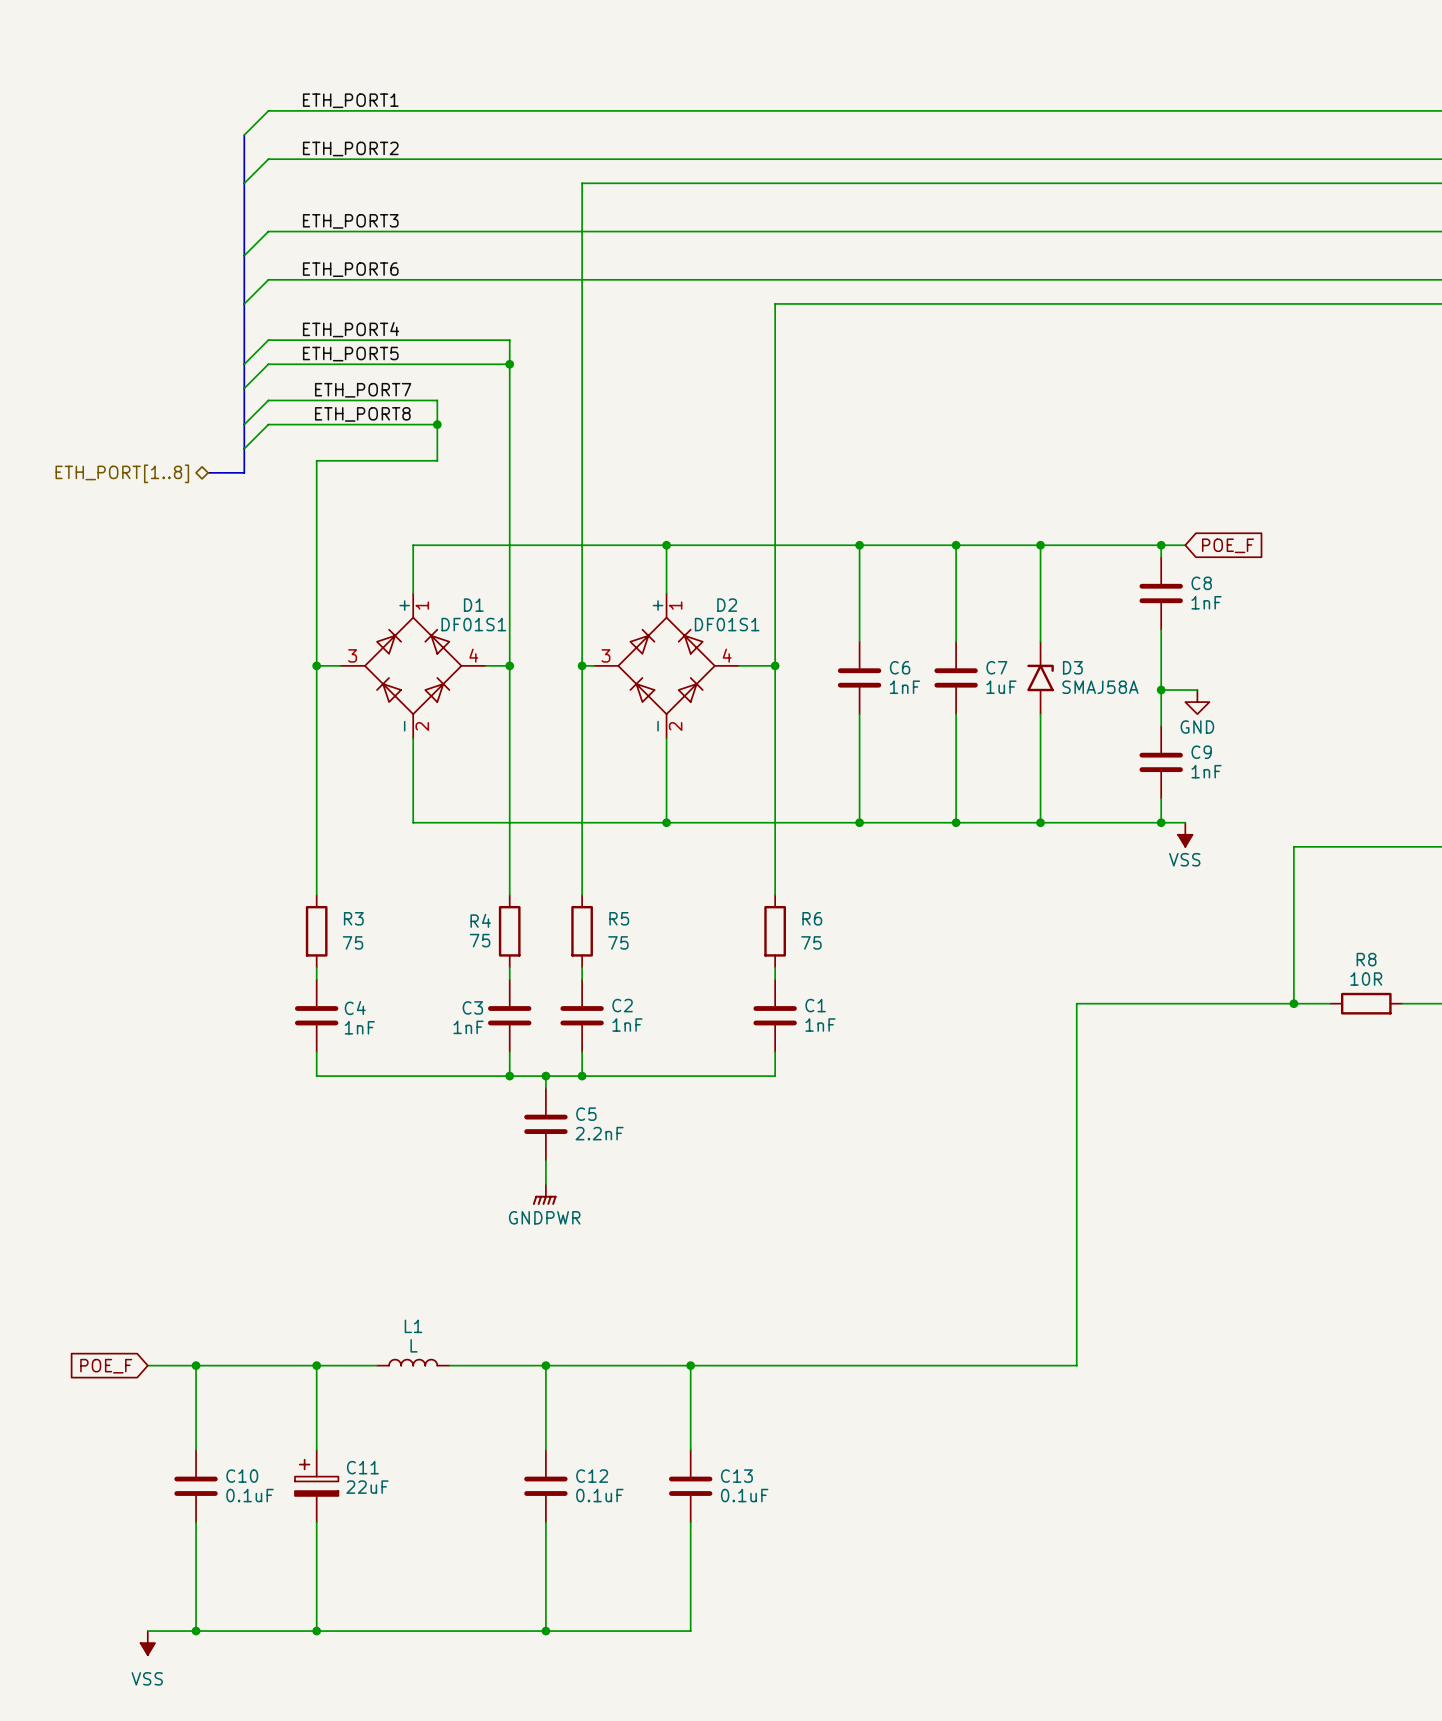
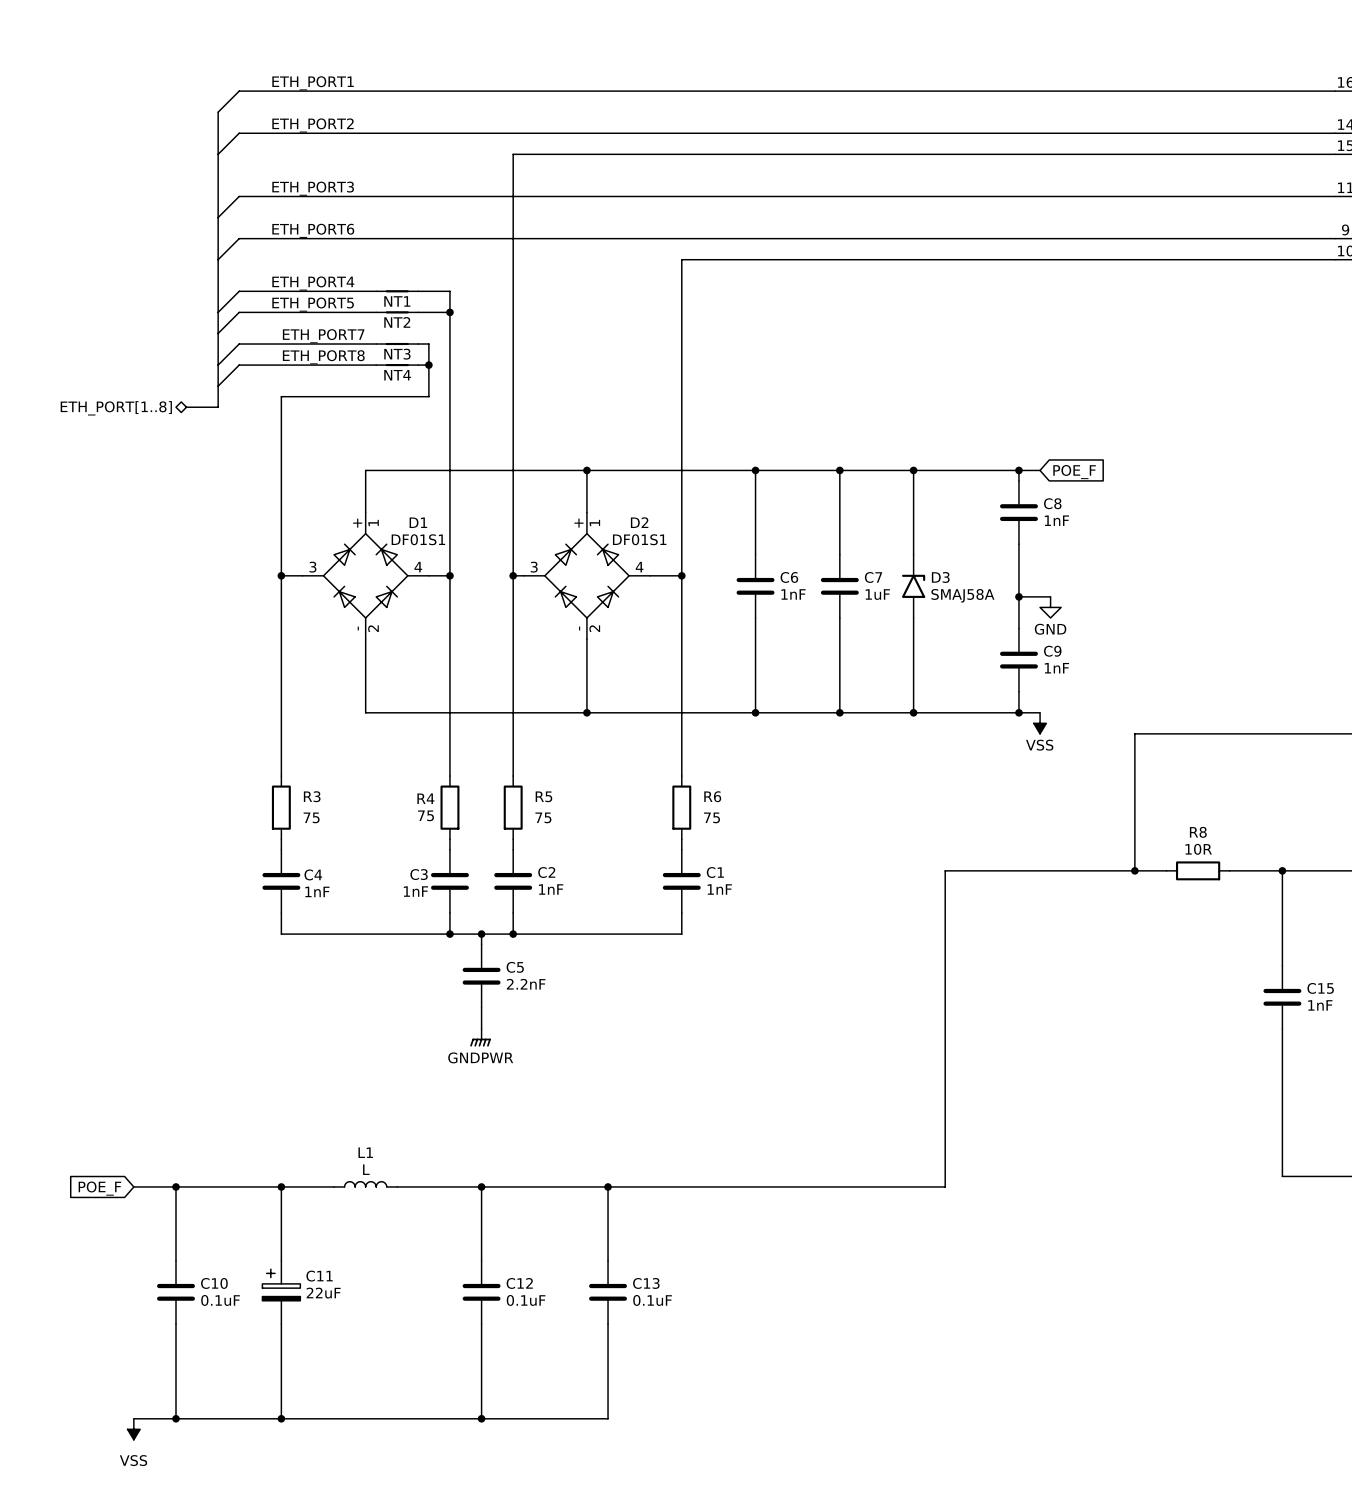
NT1: none -> (397, 291)
NT2: none -> (397, 312)
wire: (425, 400) (437, 400) (437, 460) -> (418, 344) (428, 344) (428, 396) (386, 396)
NT3: none -> (397, 344)
junction position: (437, 424) -> (428, 365)
NT4: none -> (397, 365)

